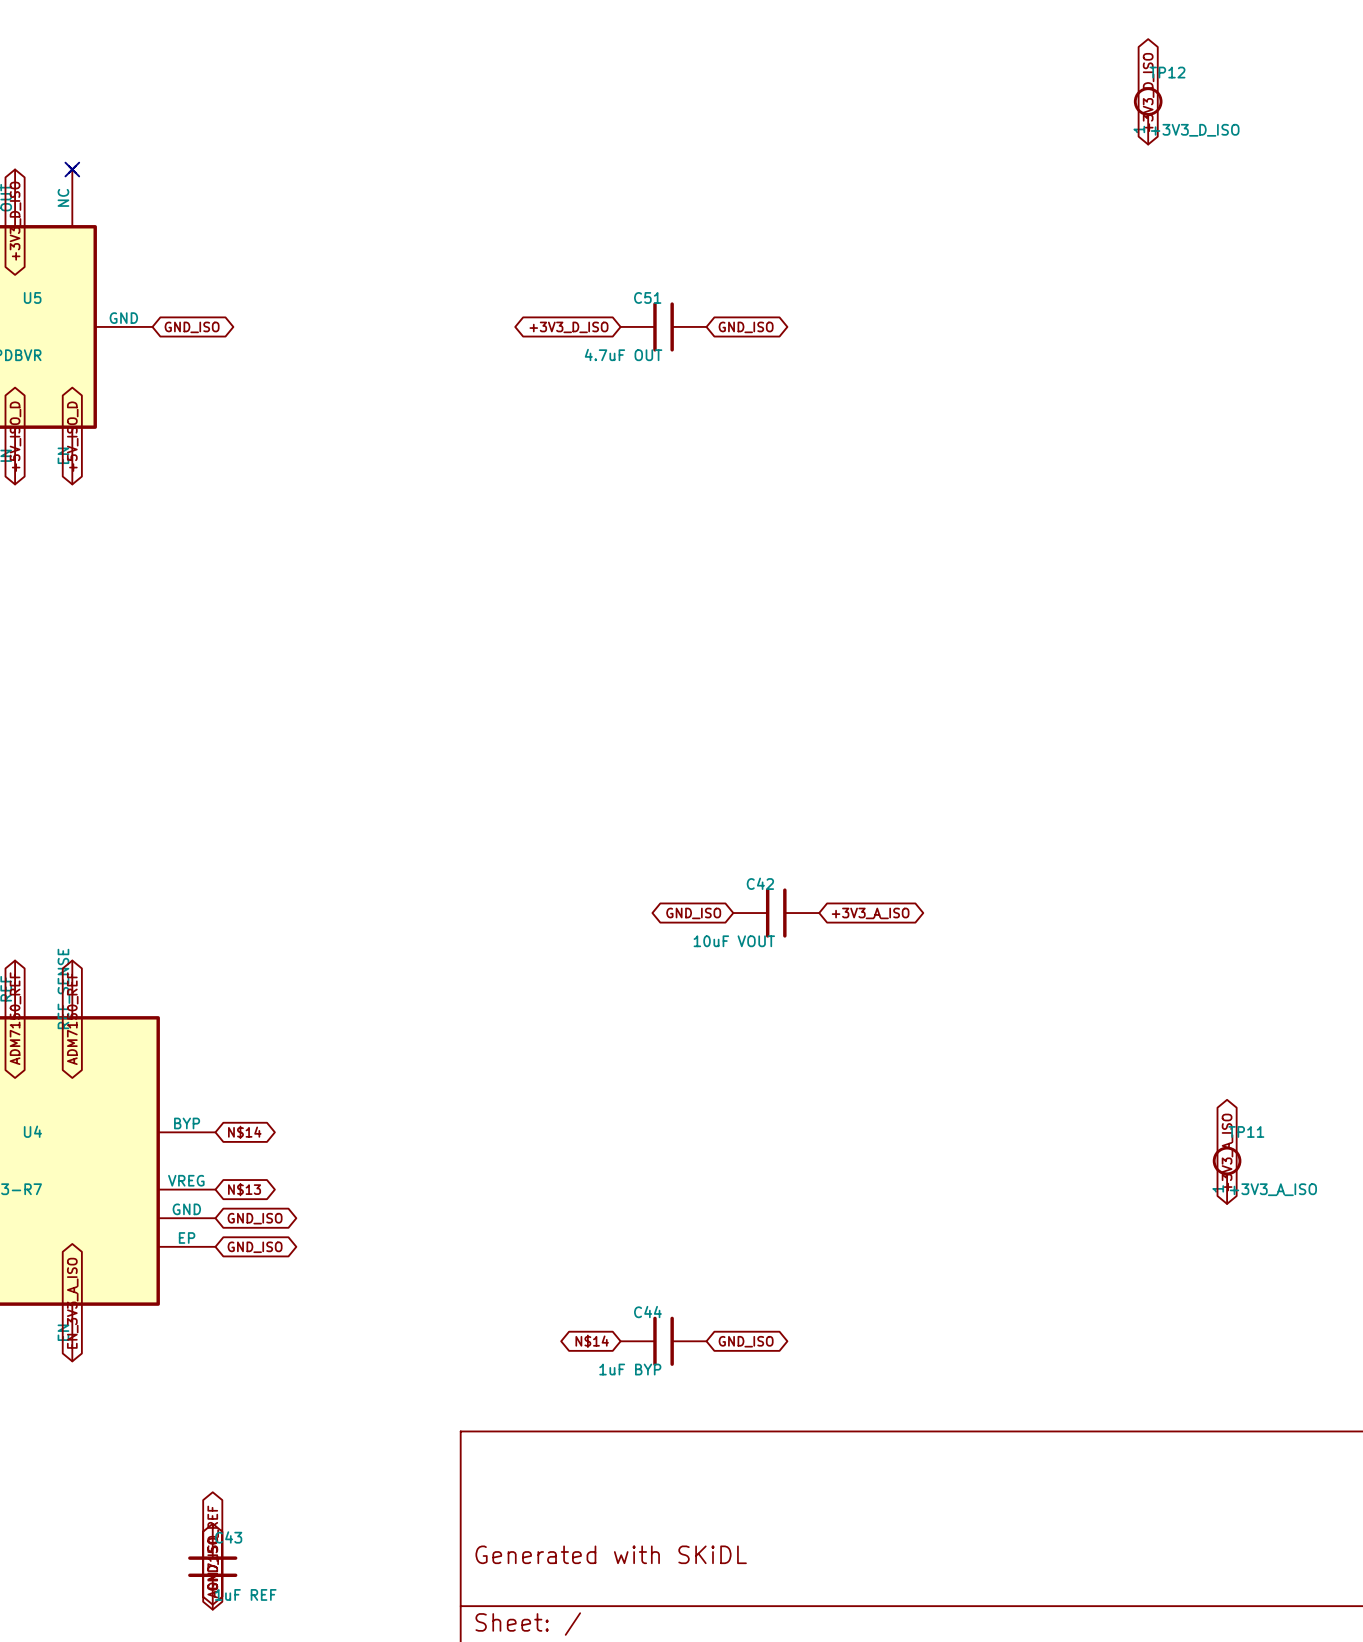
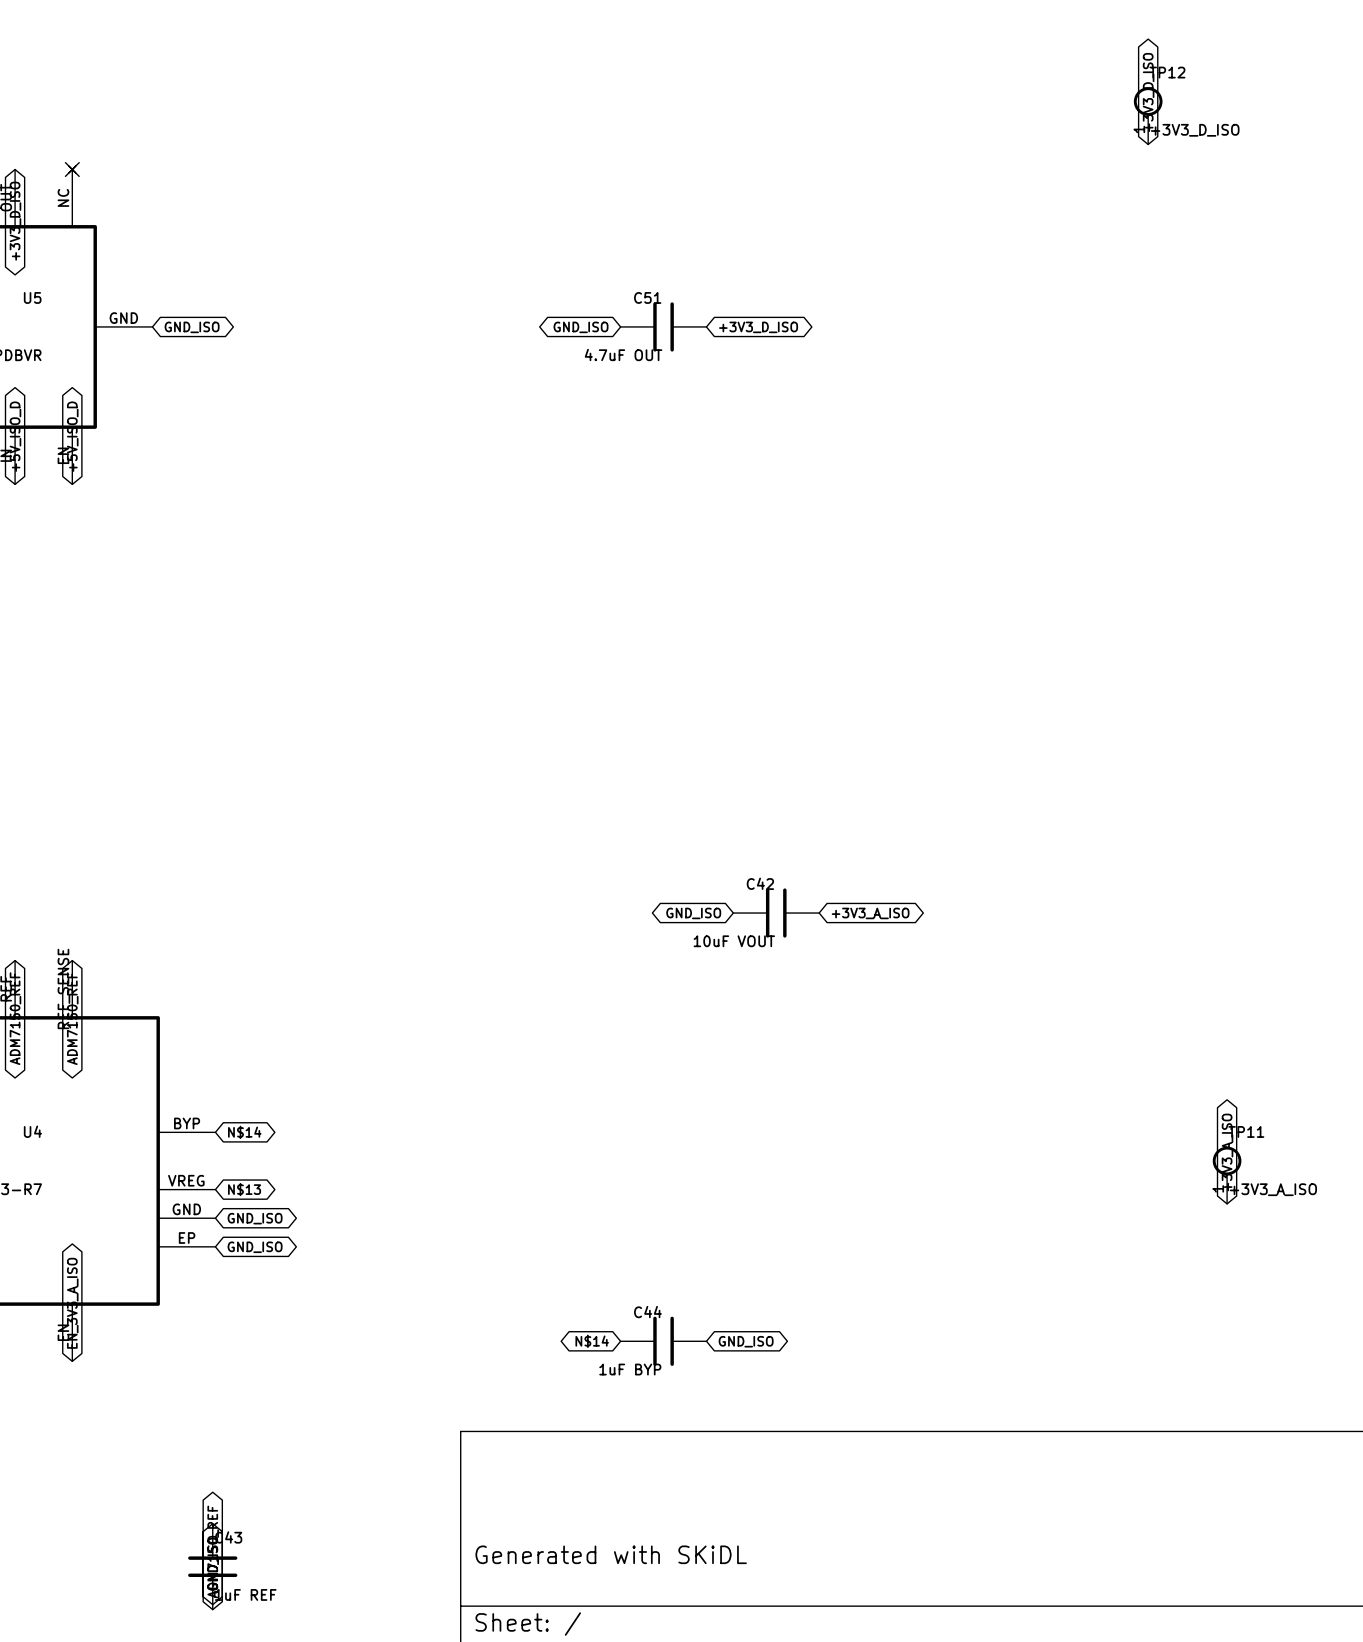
global label: +3V3_D_ISO (568, 327) -> GND_ISO (581, 327)
global label: GND_ISO (746, 327) -> +3V3_D_ISO (758, 327)

